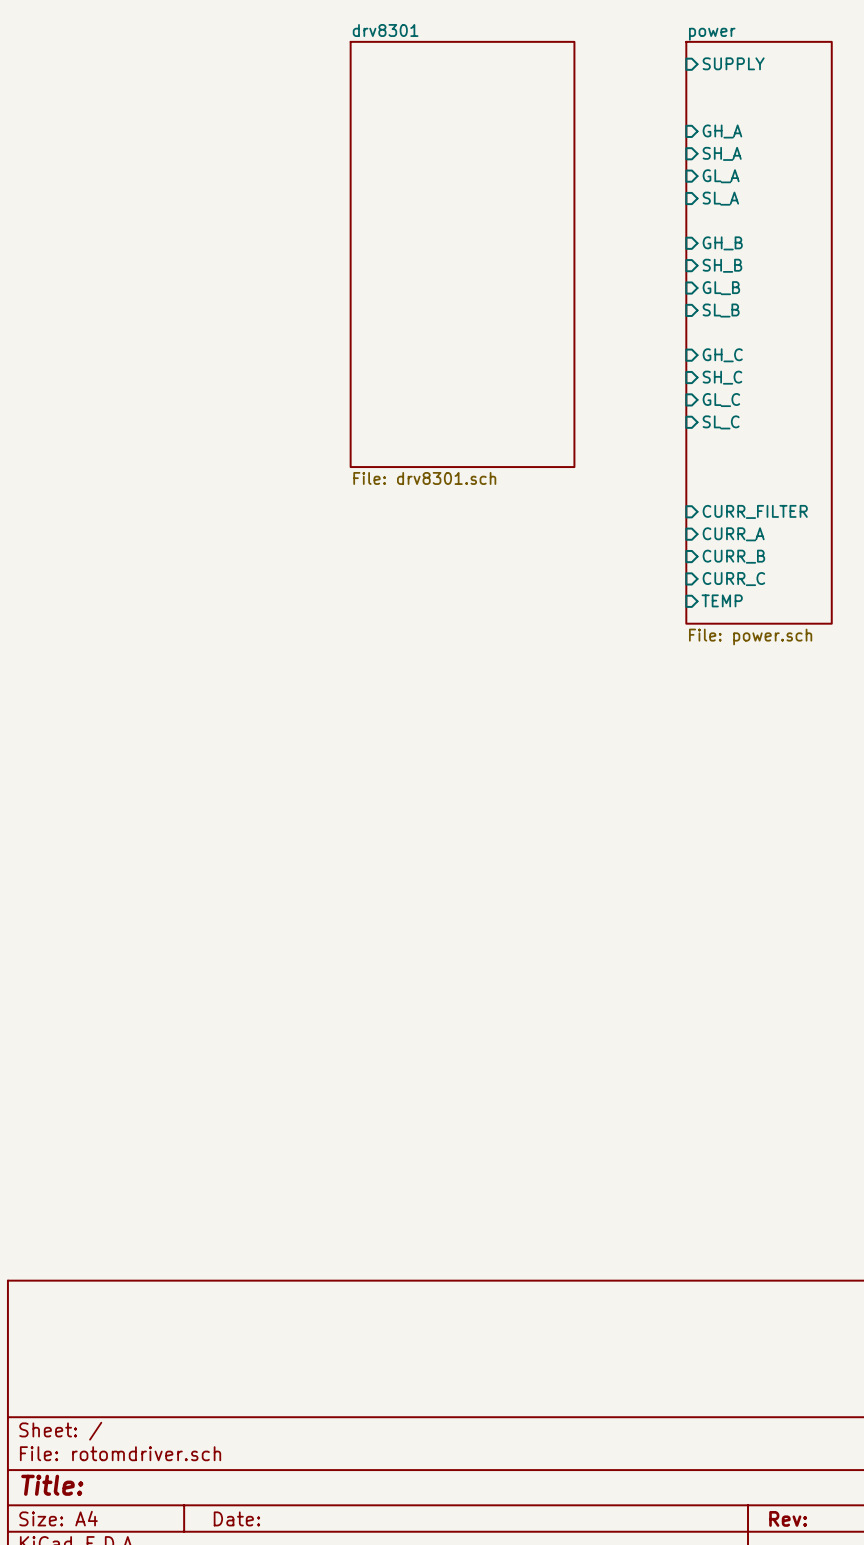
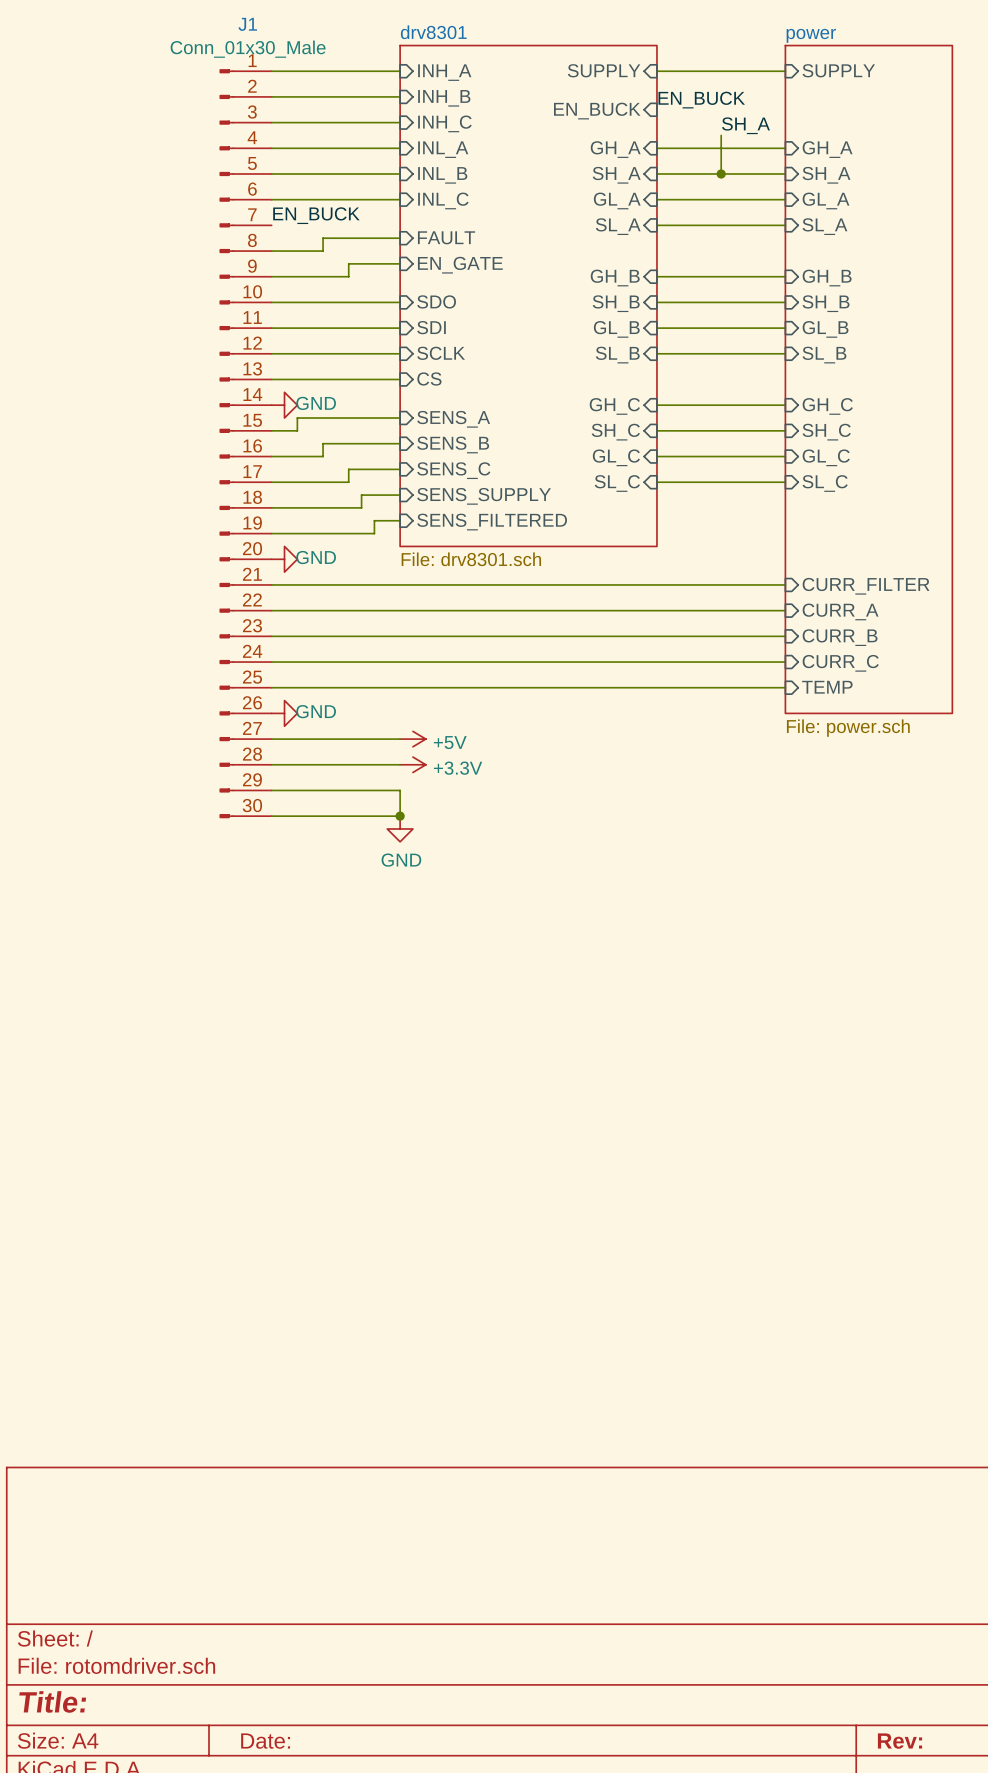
sheet drv8301 shape: [350, 41, 575, 468] -> [400, 45, 657, 547]
sheet pin: none -> SUPPLY (604, 70)
wire: none -> (271, 71) (400, 71)
sheet pin: none -> INH_A (444, 72)
wire: none -> (656, 71) (785, 71)
wire: none -> (271, 96) (400, 96)
sheet pin: none -> INH_B (444, 98)
label: none -> EN_BUCK (701, 100)
sheet pin: none -> EN_BUCK (597, 111)
wire: none -> (271, 122) (400, 122)
sheet pin: none -> INH_C (444, 123)
label: none -> SH_A (745, 125)
wire: none -> (721, 135) (721, 173)
wire: none -> (271, 148) (400, 148)
sheet pin: none -> INL_A (443, 149)
sheet pin: none -> GH_A (615, 149)
wire: none -> (656, 148) (785, 148)
wire: none -> (271, 173) (400, 173)
sheet pin: none -> INL_B (442, 175)
sheet pin: none -> SH_A (616, 175)
wire: none -> (656, 173) (785, 173)
junction: none -> (721, 173)
wire: none -> (271, 199) (400, 199)
sheet pin: none -> INL_C (443, 200)
sheet pin: none -> GL_A (617, 200)
wire: none -> (656, 199) (785, 199)
label: none -> EN_BUCK (316, 215)
sheet pin: none -> SL_A (618, 226)
wire: none -> (656, 225) (785, 225)
wire: none -> (400, 238) (323, 238) (323, 251) (271, 251)
sheet pin: none -> FAULT (446, 237)
wire: none -> (400, 263) (348, 263) (348, 276) (271, 276)
sheet pin: none -> EN_GATE (460, 265)
sheet pin: none -> GH_B (615, 278)
wire: none -> (656, 276) (785, 276)
wire: none -> (271, 302) (400, 302)
sheet pin: none -> SDO (436, 301)
sheet pin: none -> SH_B (616, 303)
wire: none -> (656, 302) (785, 302)
sheet pin: none -> SDI (431, 327)
wire: none -> (271, 328) (400, 328)
sheet pin: none -> GL_B (616, 329)
wire: none -> (656, 328) (785, 328)
sheet pin: none -> SCLK (441, 353)
wire: none -> (271, 353) (400, 353)
sheet pin: none -> SL_B (617, 355)
wire: none -> (656, 353) (785, 353)
wire: none -> (271, 379) (400, 379)
sheet pin: none -> CS (429, 378)
power symbol: none -> GND (284, 405)
sheet pin: none -> GH_C (614, 406)
wire: none -> (656, 405) (785, 405)
wire: none -> (400, 418) (297, 418) (297, 430) (271, 430)
sheet pin: none -> SENS_A (453, 419)
sheet pin: none -> SH_C (615, 432)
wire: none -> (656, 430) (785, 430)
J1: none -> Conn_01x30_Male (245, 443)
wire: none -> (400, 443) (323, 443) (323, 456) (271, 456)
sheet pin: none -> SENS_B (453, 444)
wire: none -> (656, 456) (785, 456)
sheet pin: none -> GL_C (616, 457)
wire: none -> (400, 469) (348, 469) (348, 482) (271, 482)
sheet pin: none -> SENS_C (453, 470)
sheet pin: none -> SL_C (617, 483)
wire: none -> (656, 482) (785, 482)
wire: none -> (400, 495) (361, 495) (361, 507) (271, 507)
sheet pin: none -> SENS_SUPPLY (484, 496)
wire: none -> (400, 520) (374, 520) (374, 533) (271, 533)
sheet pin: none -> SENS_FILTERED (492, 522)
power symbol: none -> GND (284, 559)
wire: none -> (271, 584) (785, 584)
wire: none -> (271, 610) (785, 610)
wire: none -> (271, 636) (785, 636)
wire: none -> (271, 662) (785, 662)
wire: none -> (271, 687) (785, 687)
power symbol: none -> GND (284, 713)
wire: none -> (271, 739) (400, 739)
power symbol: none -> +5V (412, 739)
wire: none -> (271, 764) (400, 764)
power symbol: none -> +3.3V (412, 764)
wire: none -> (271, 790) (400, 790) (400, 816) (271, 816)
junction: none -> (400, 816)
power symbol: none -> GND (400, 828)

